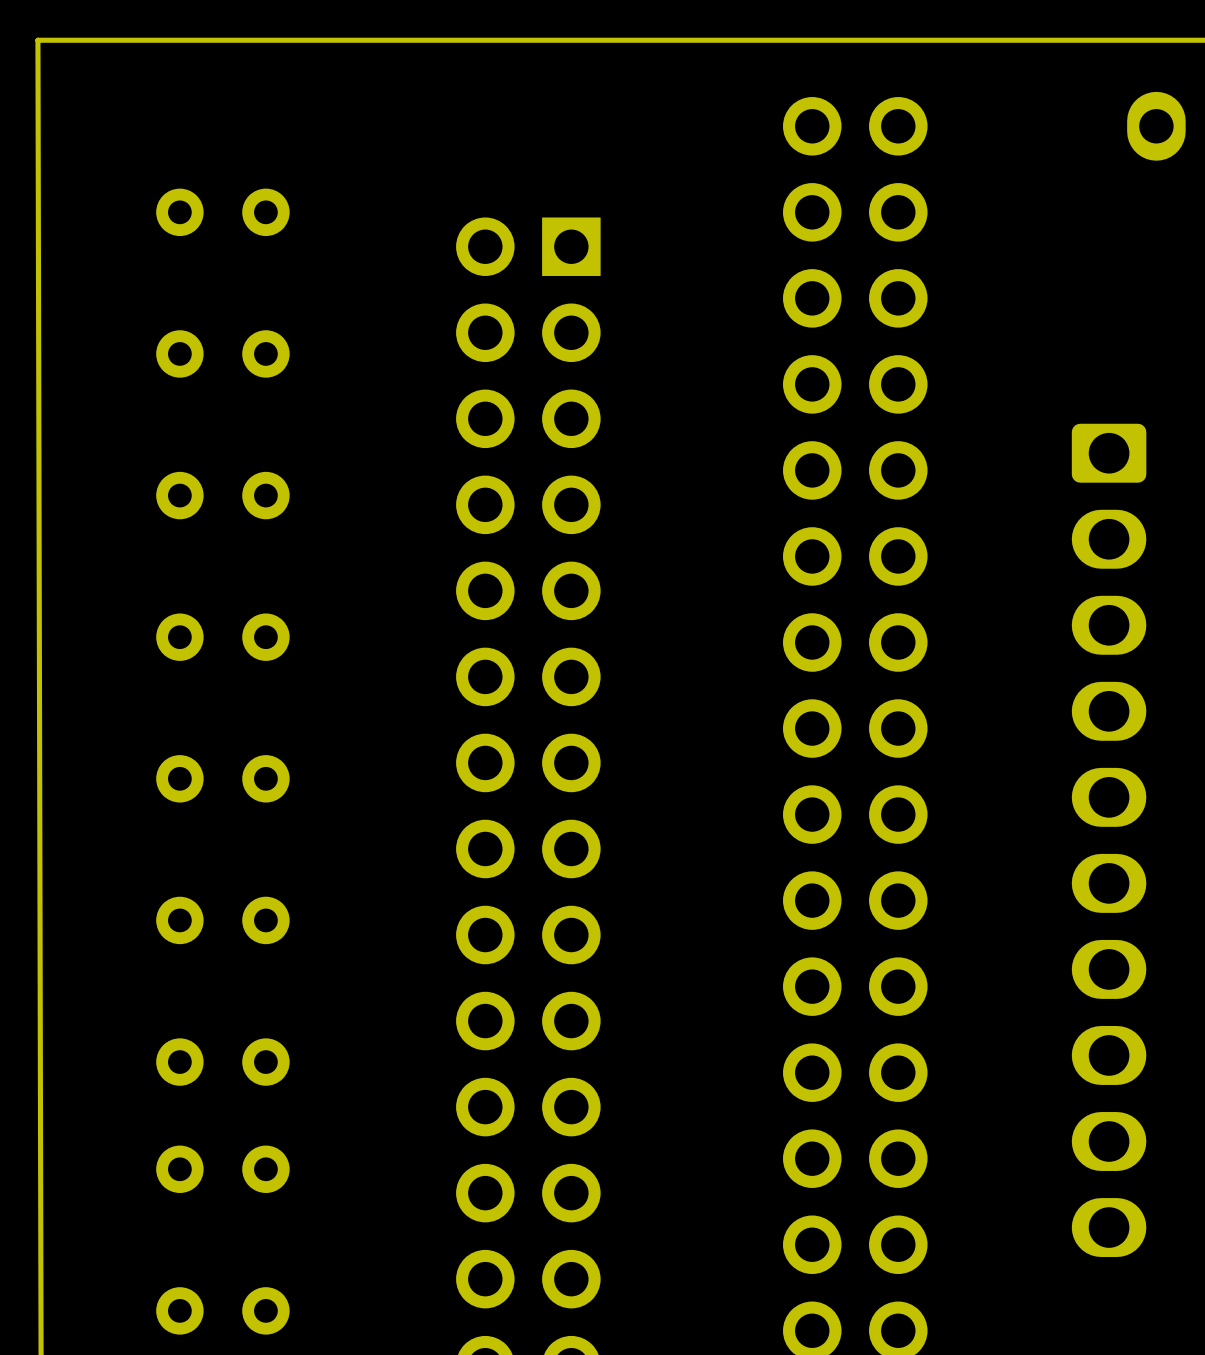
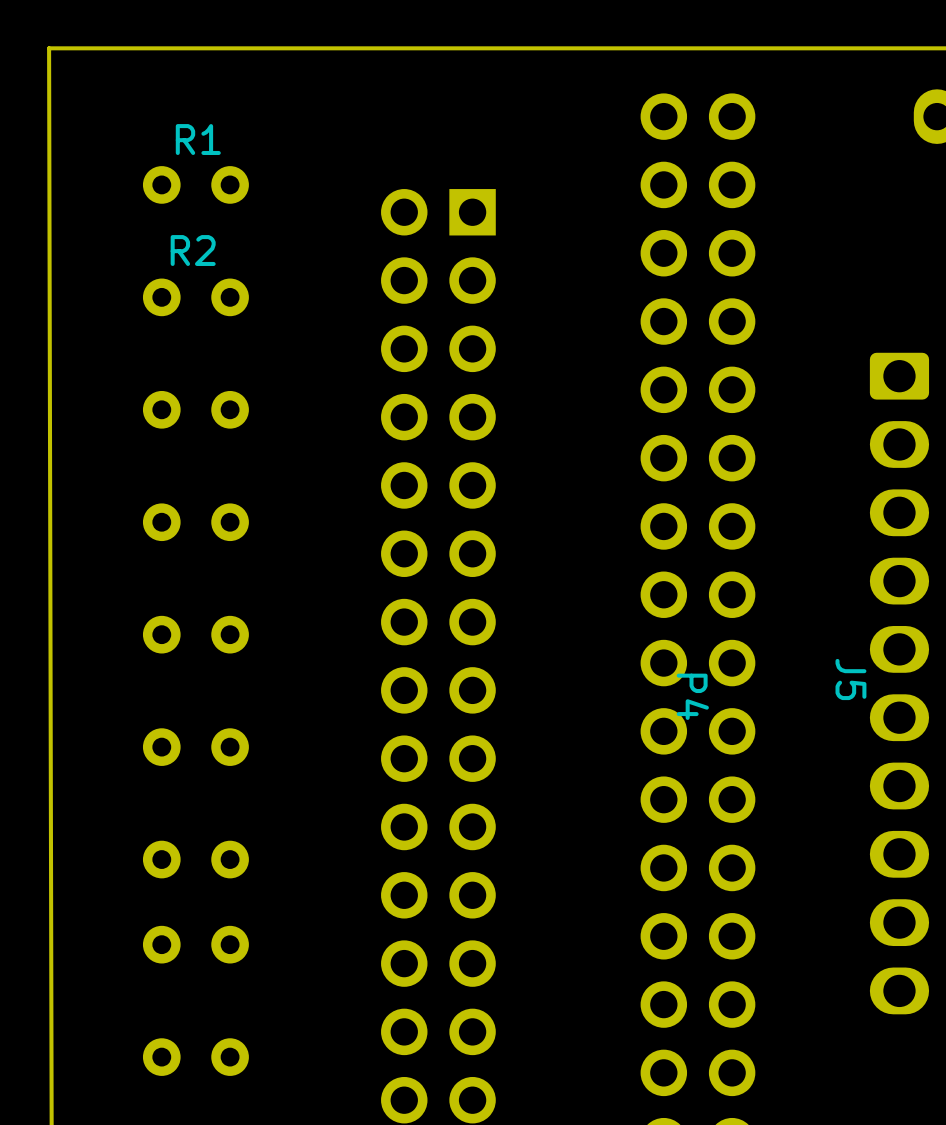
R1 name: none -> R1 (198, 139)
R2 name: none -> R2 (193, 250)
J5 name: none -> J5 (850, 679)
P4 name: none -> P4 (692, 696)

